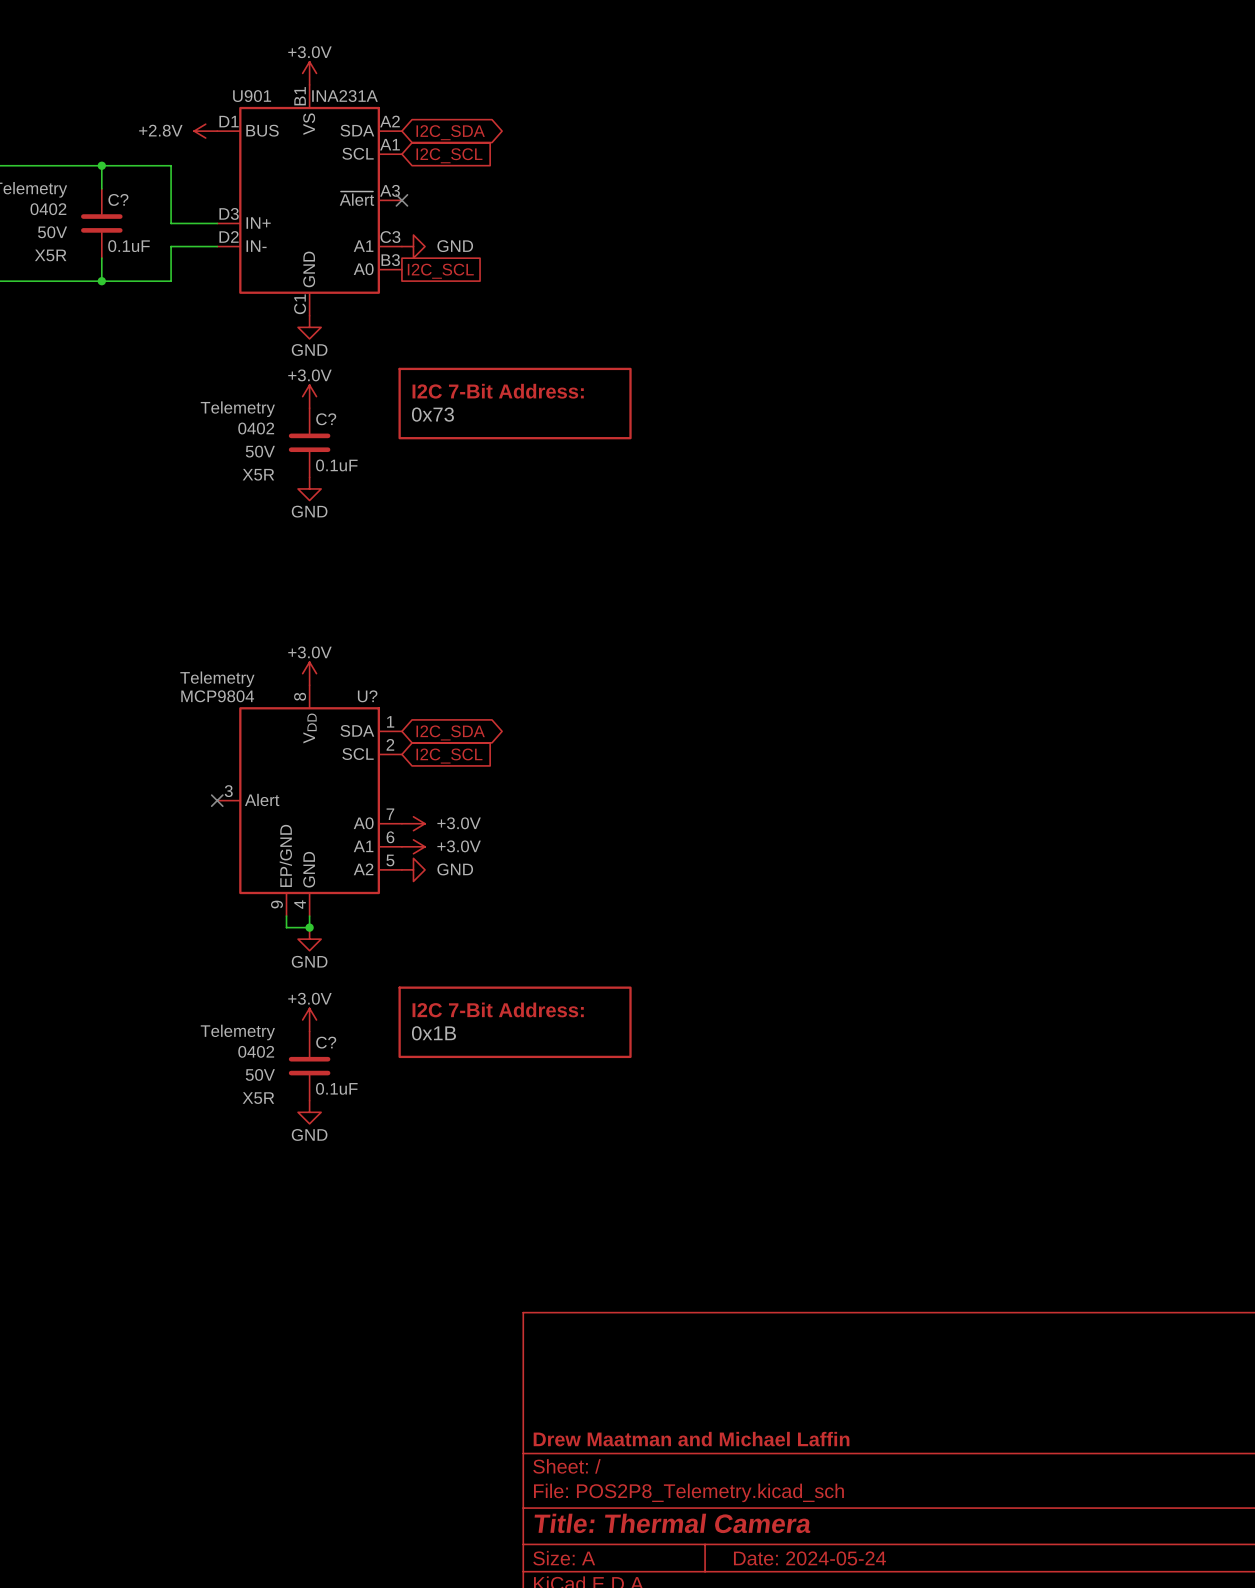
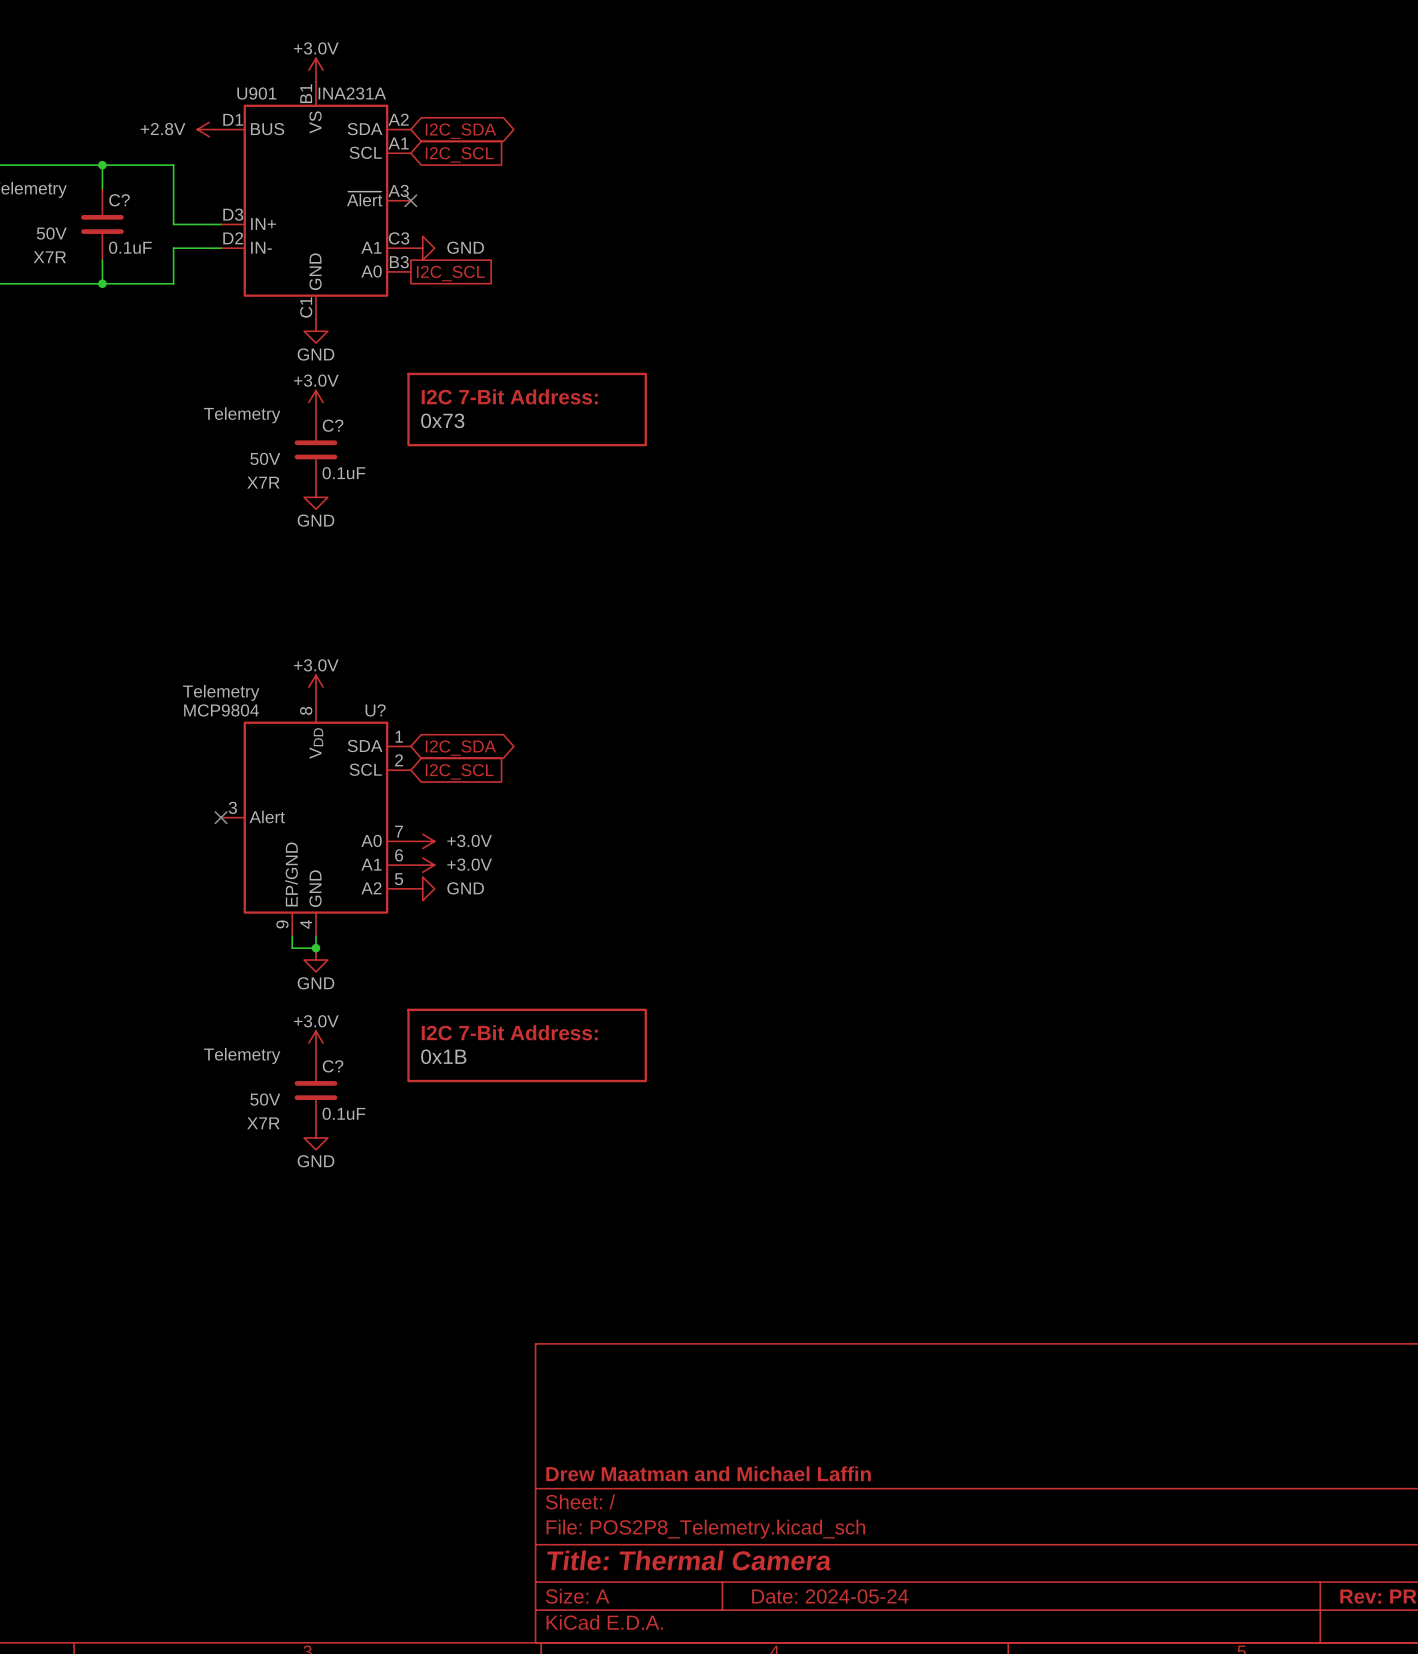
C? text: 0402 (48, 209) -> none
C? text: X5R (50, 255) -> X7R (49, 257)
C? text: 0402 (256, 428) -> none
C? text: X5R (258, 474) -> X7R (263, 482)
C? text: 0402 (256, 1051) -> none
C? text: X5R (258, 1098) -> X7R (263, 1123)

